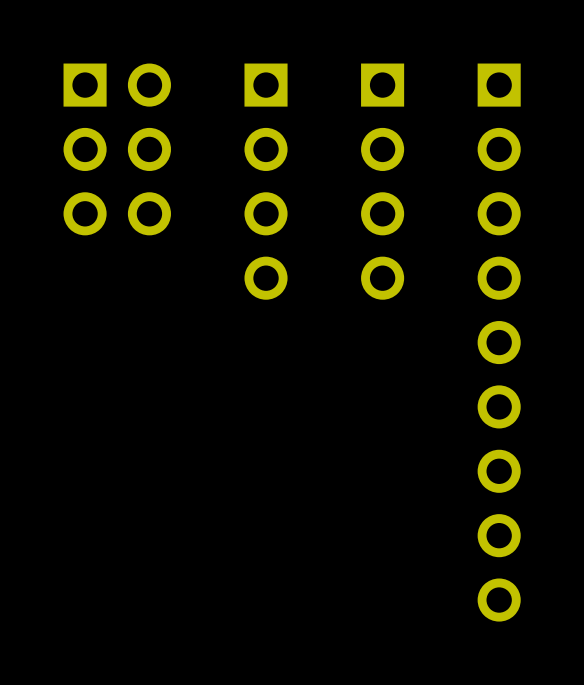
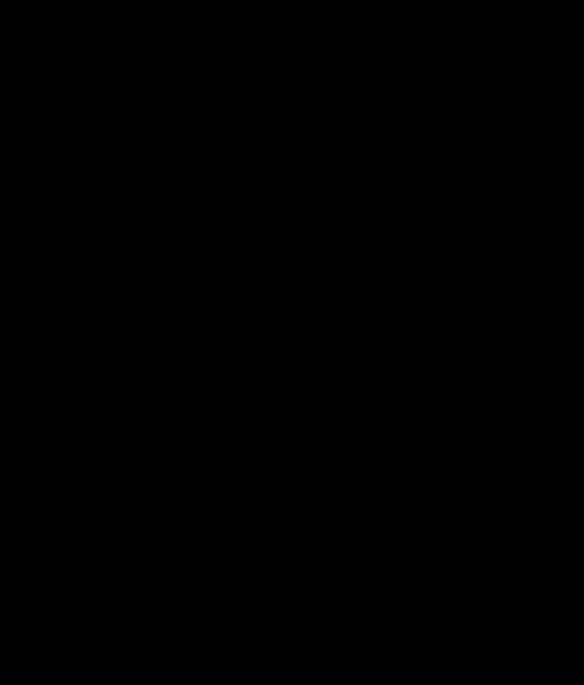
part: (117, 149) -> none
part: (266, 181) -> none
part: (382, 181) -> none
part: (499, 342) -> none

